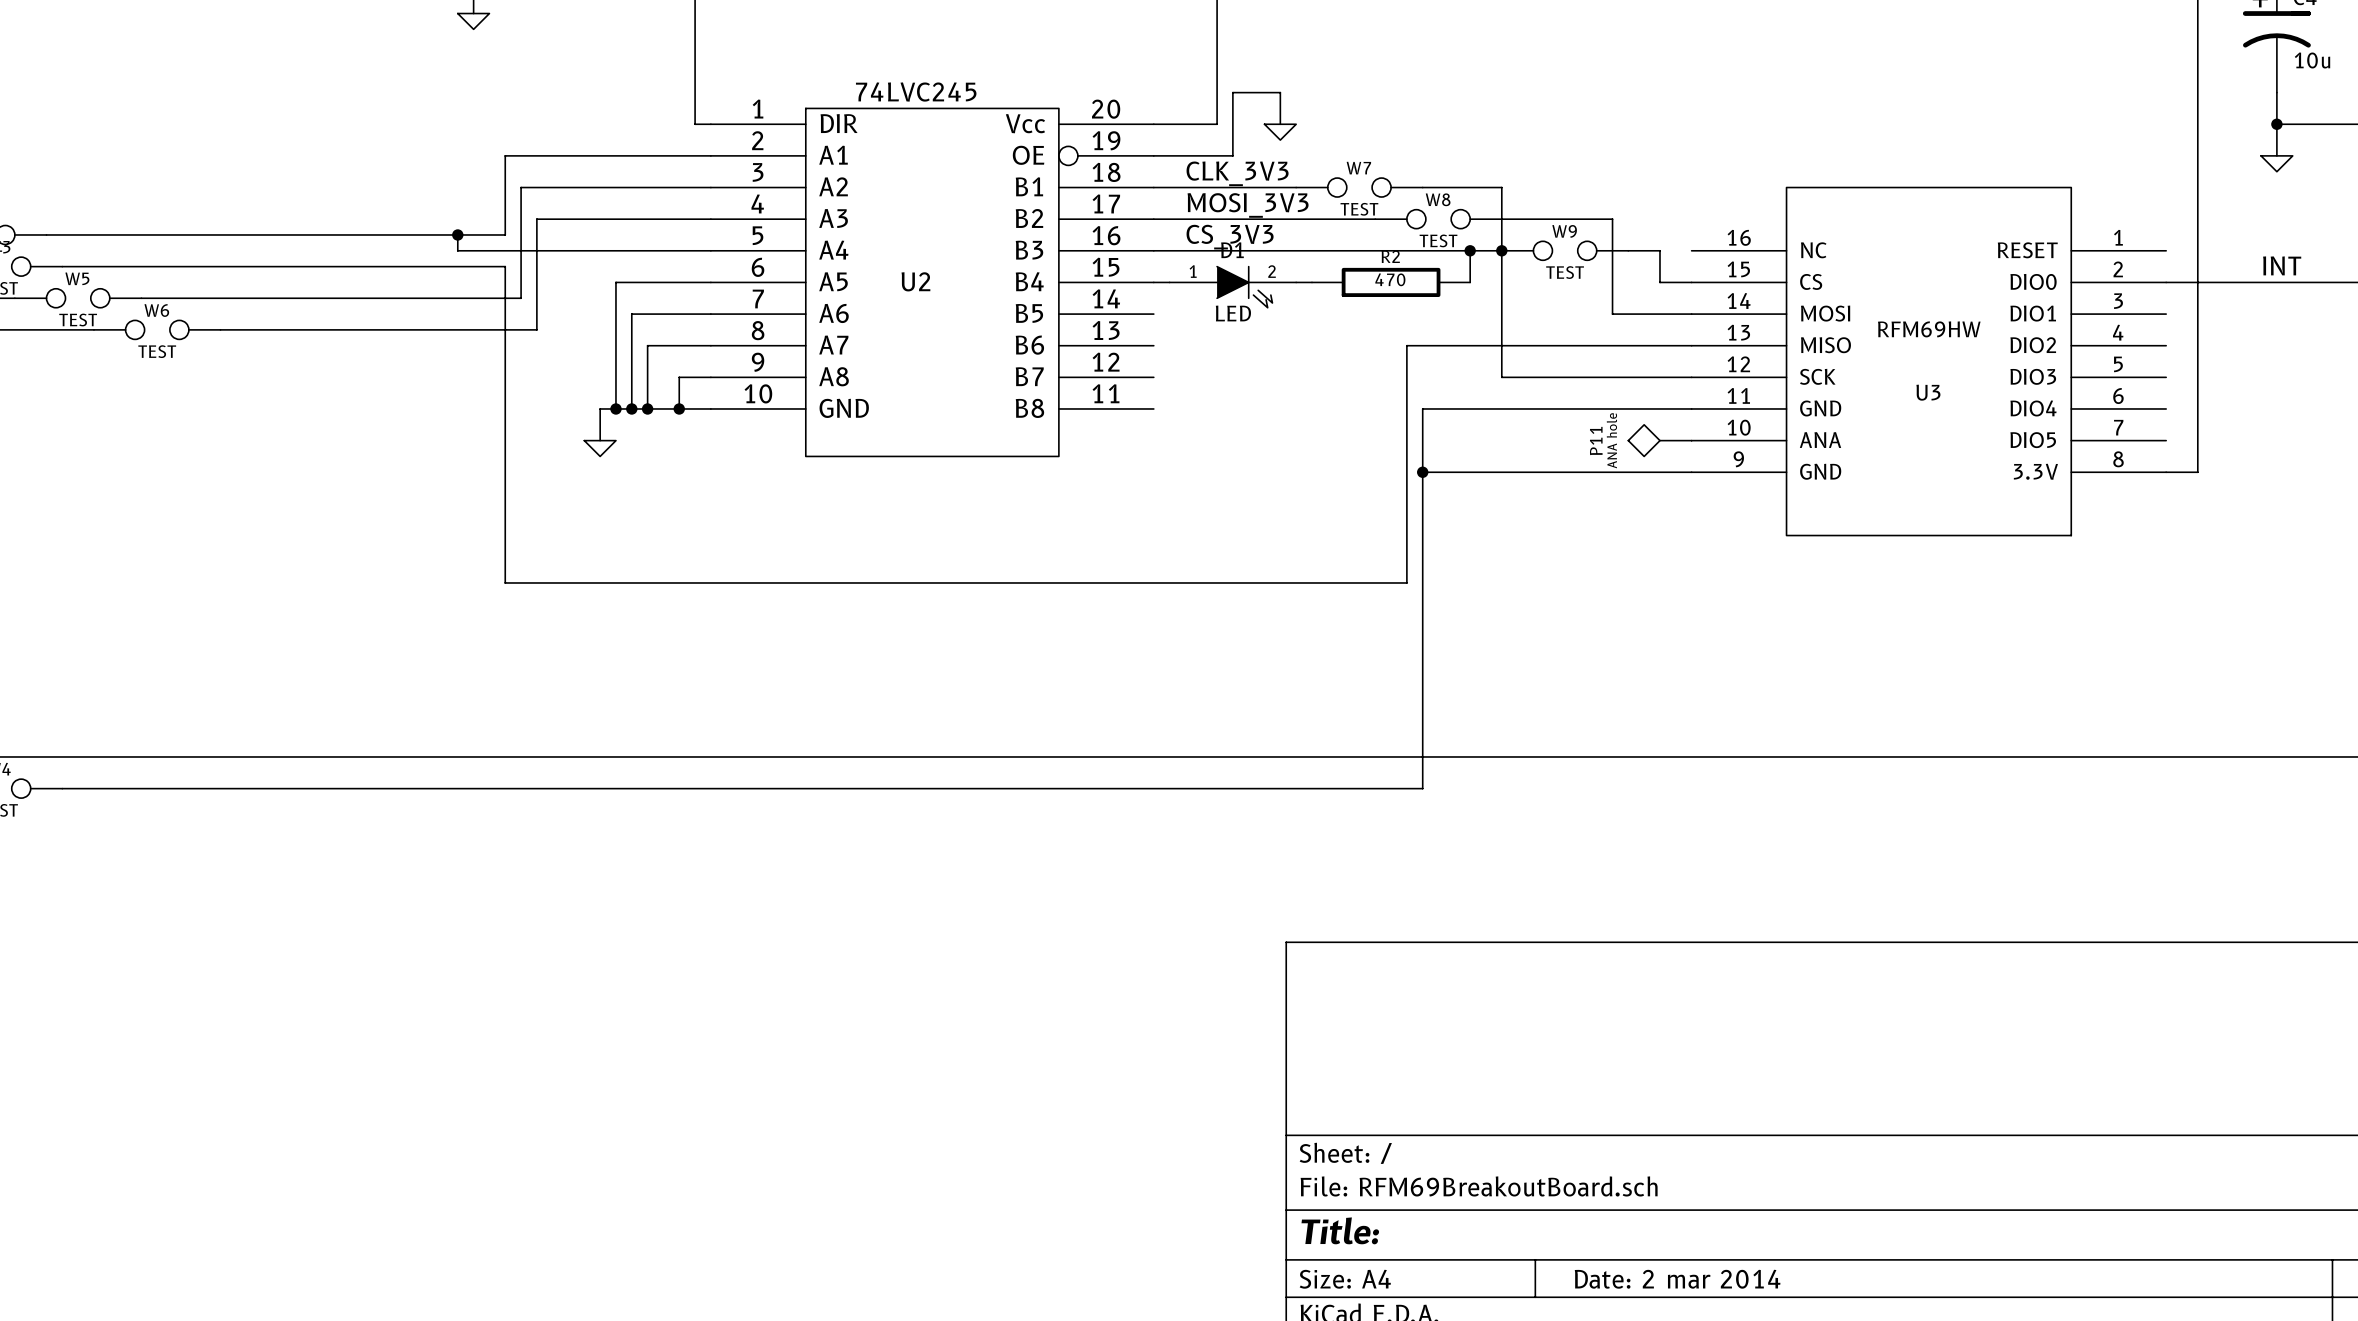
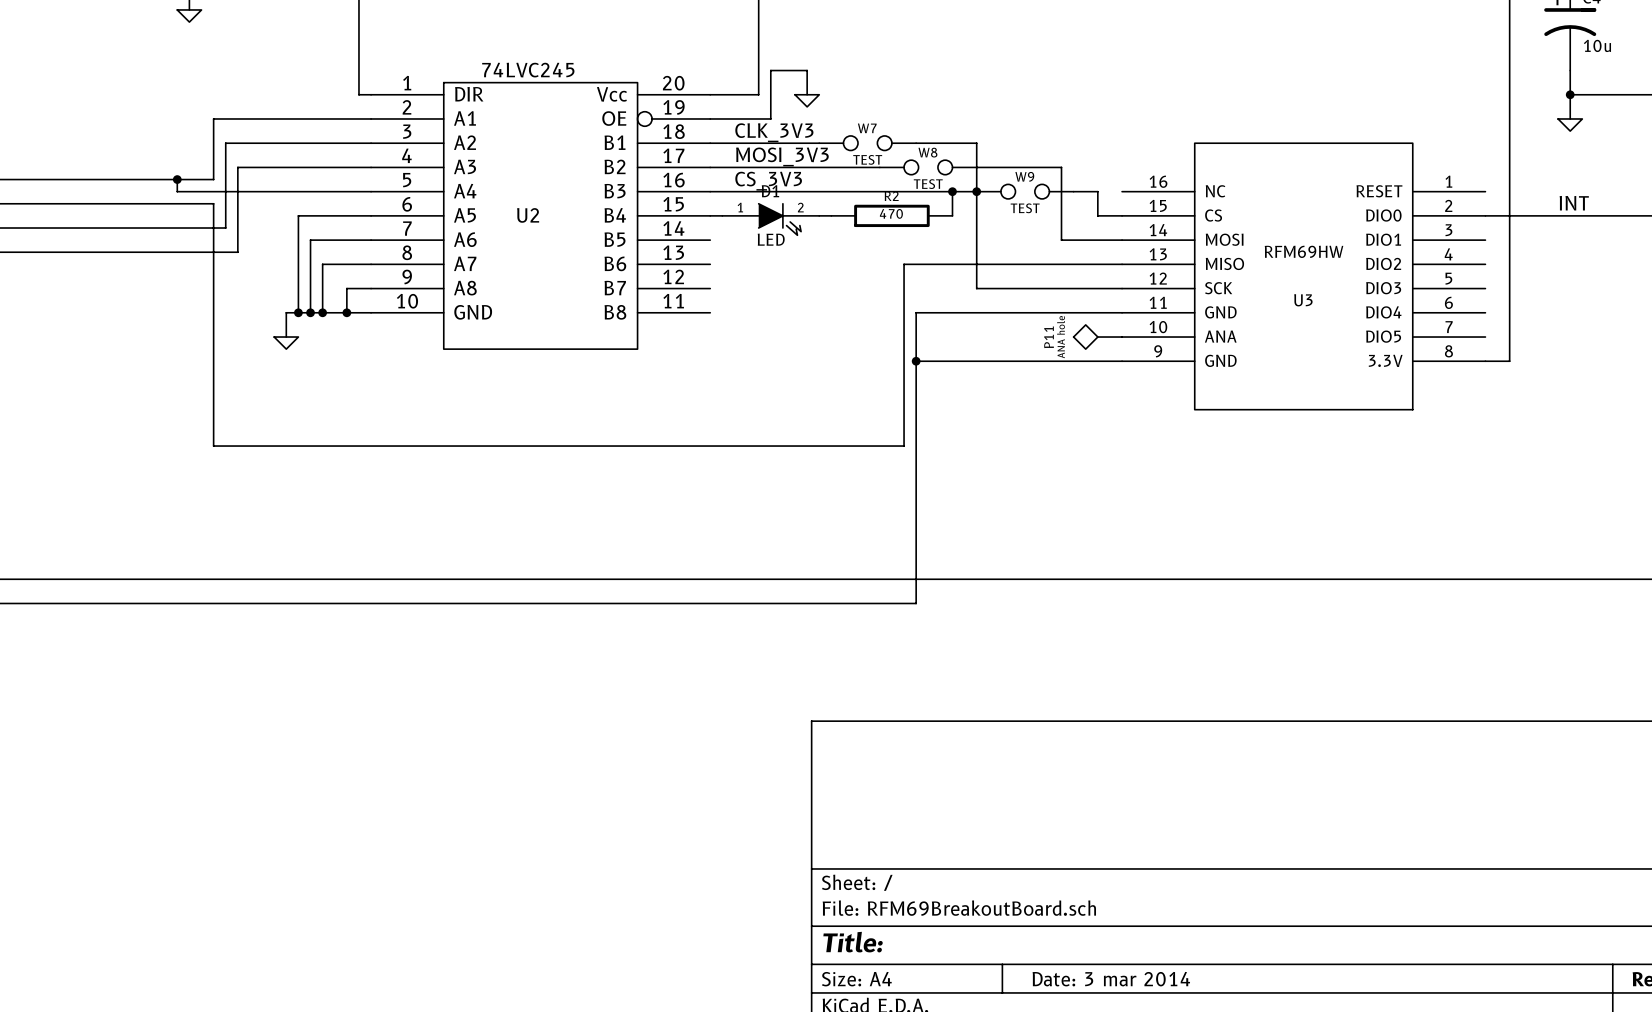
title block: Date: 2 mar 2014 (1677, 1279) -> Date: 3 mar 2014 (1111, 979)

